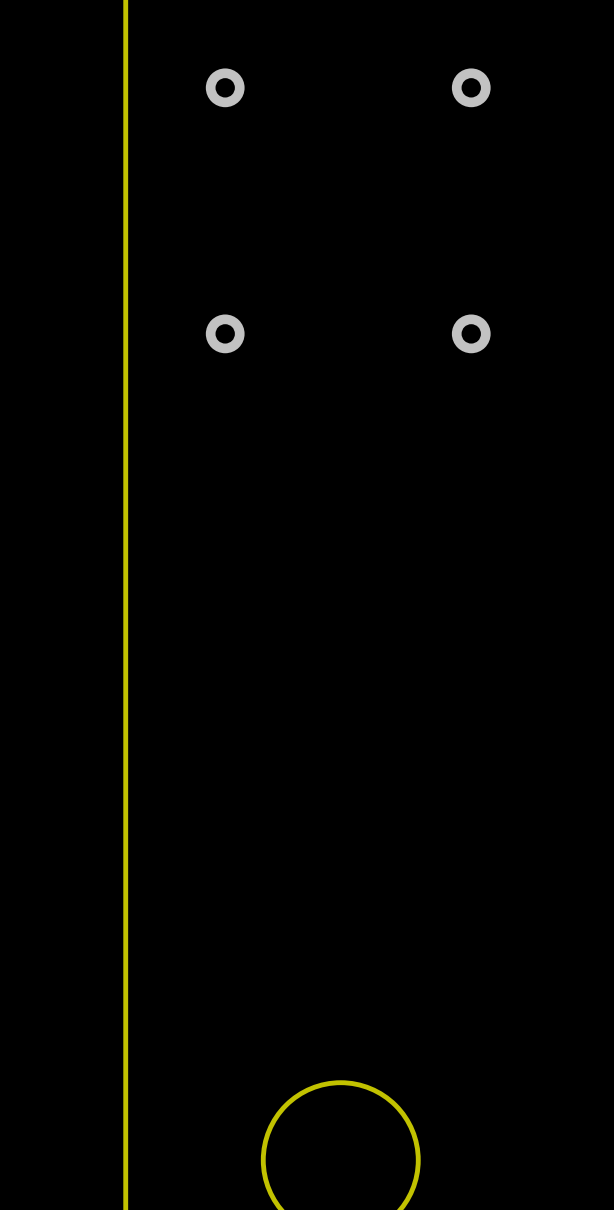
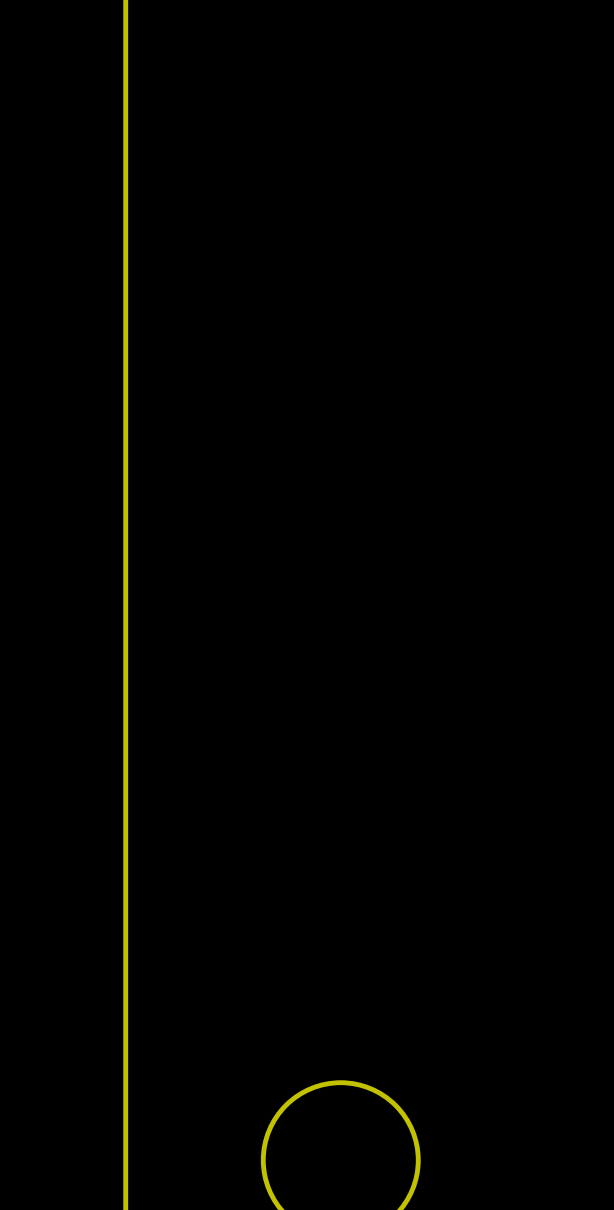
via: (225, 87) -> none
via: (471, 87) -> none
via: (225, 333) -> none
via: (471, 333) -> none

